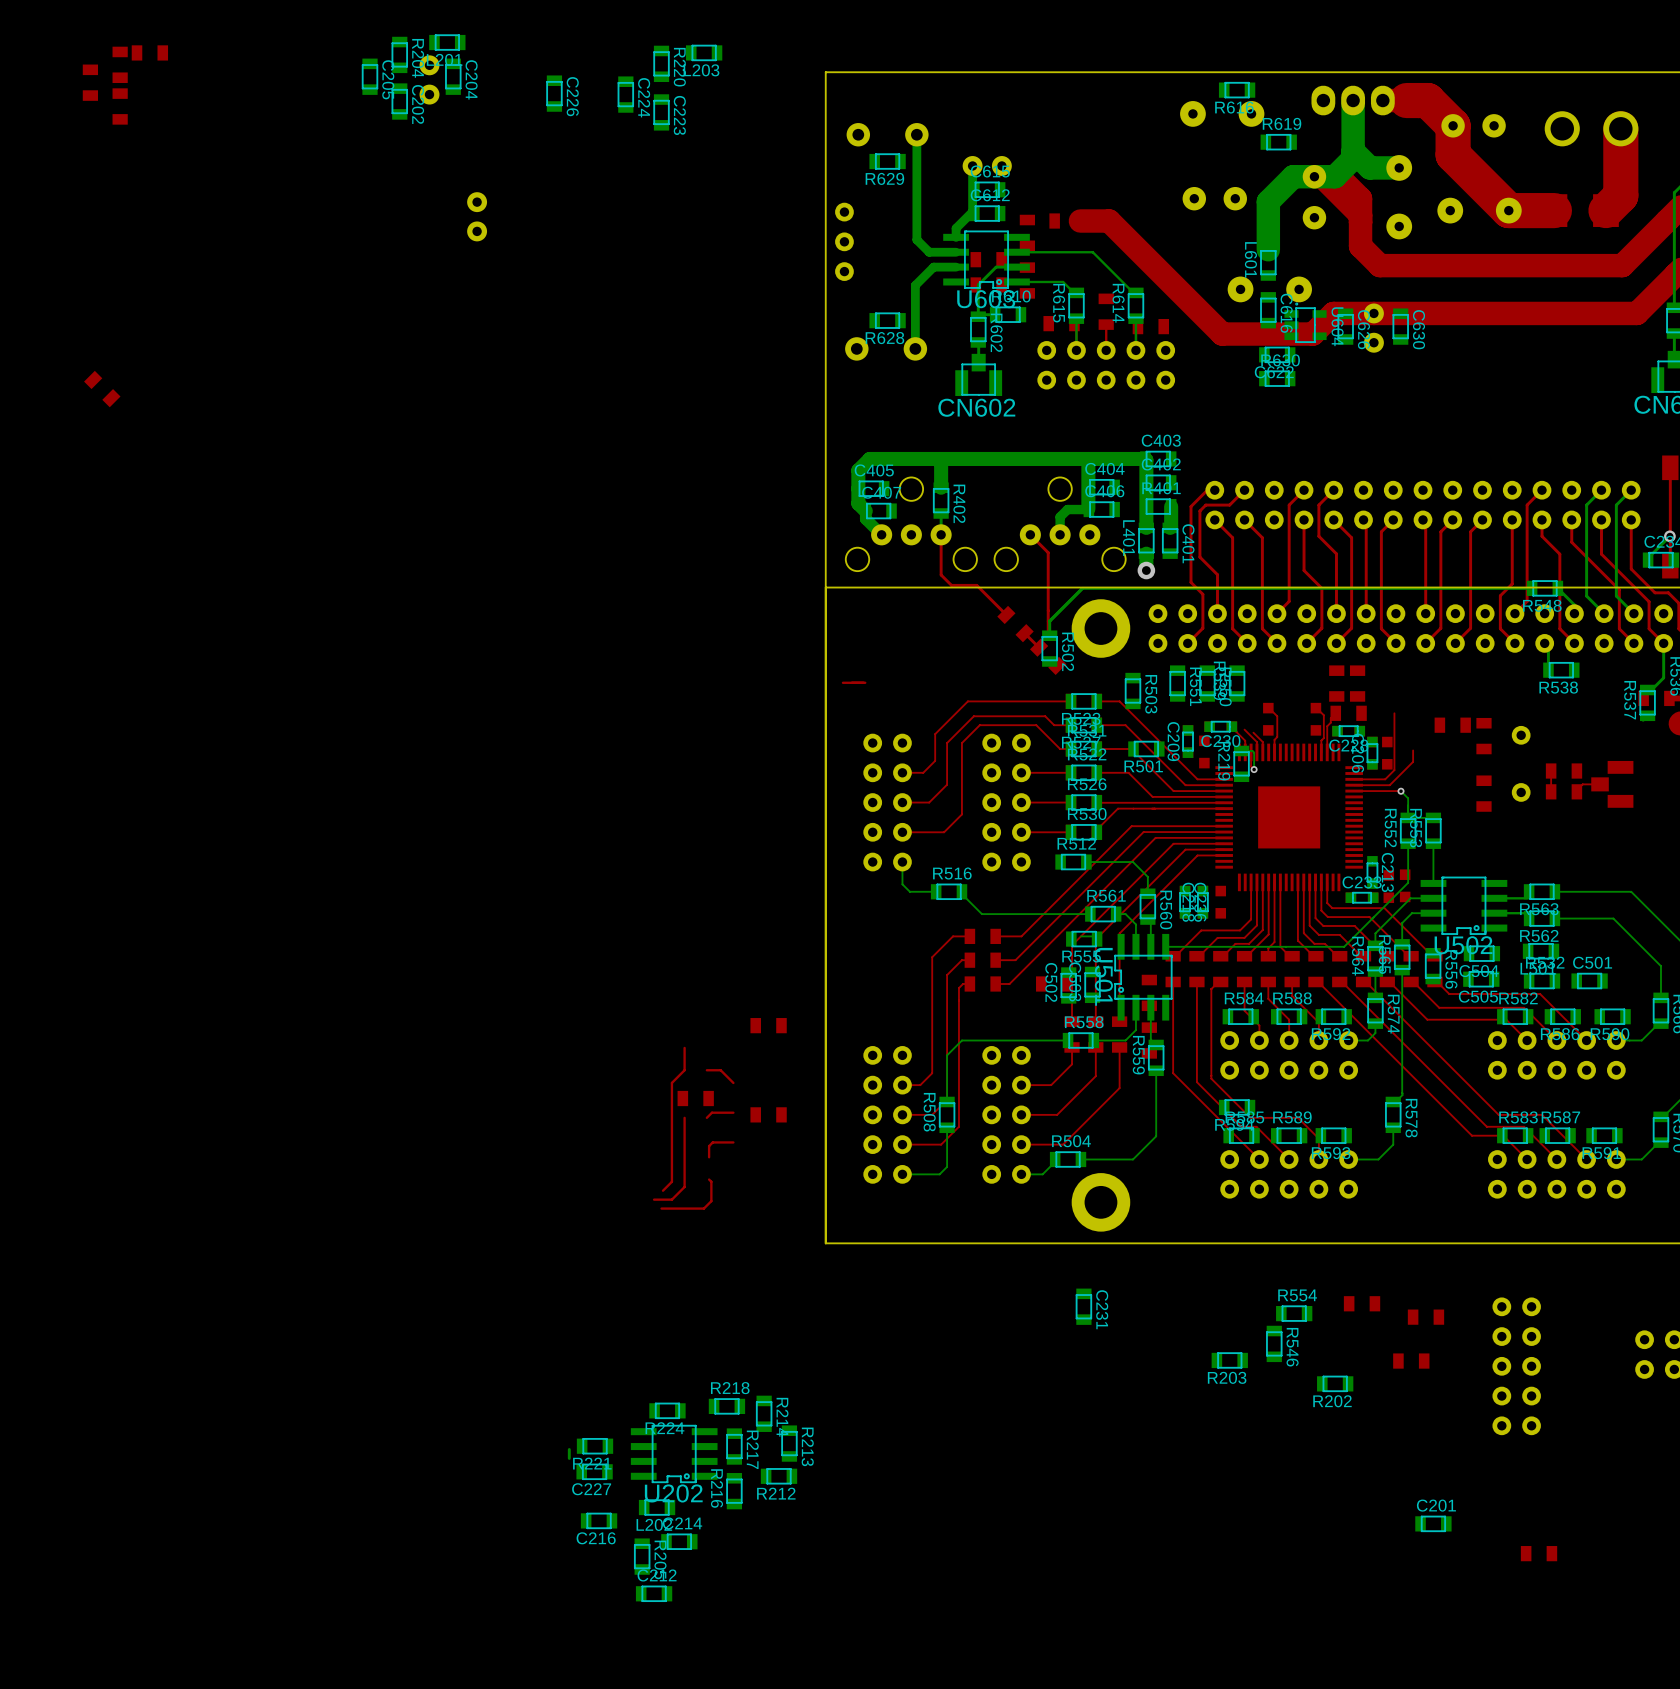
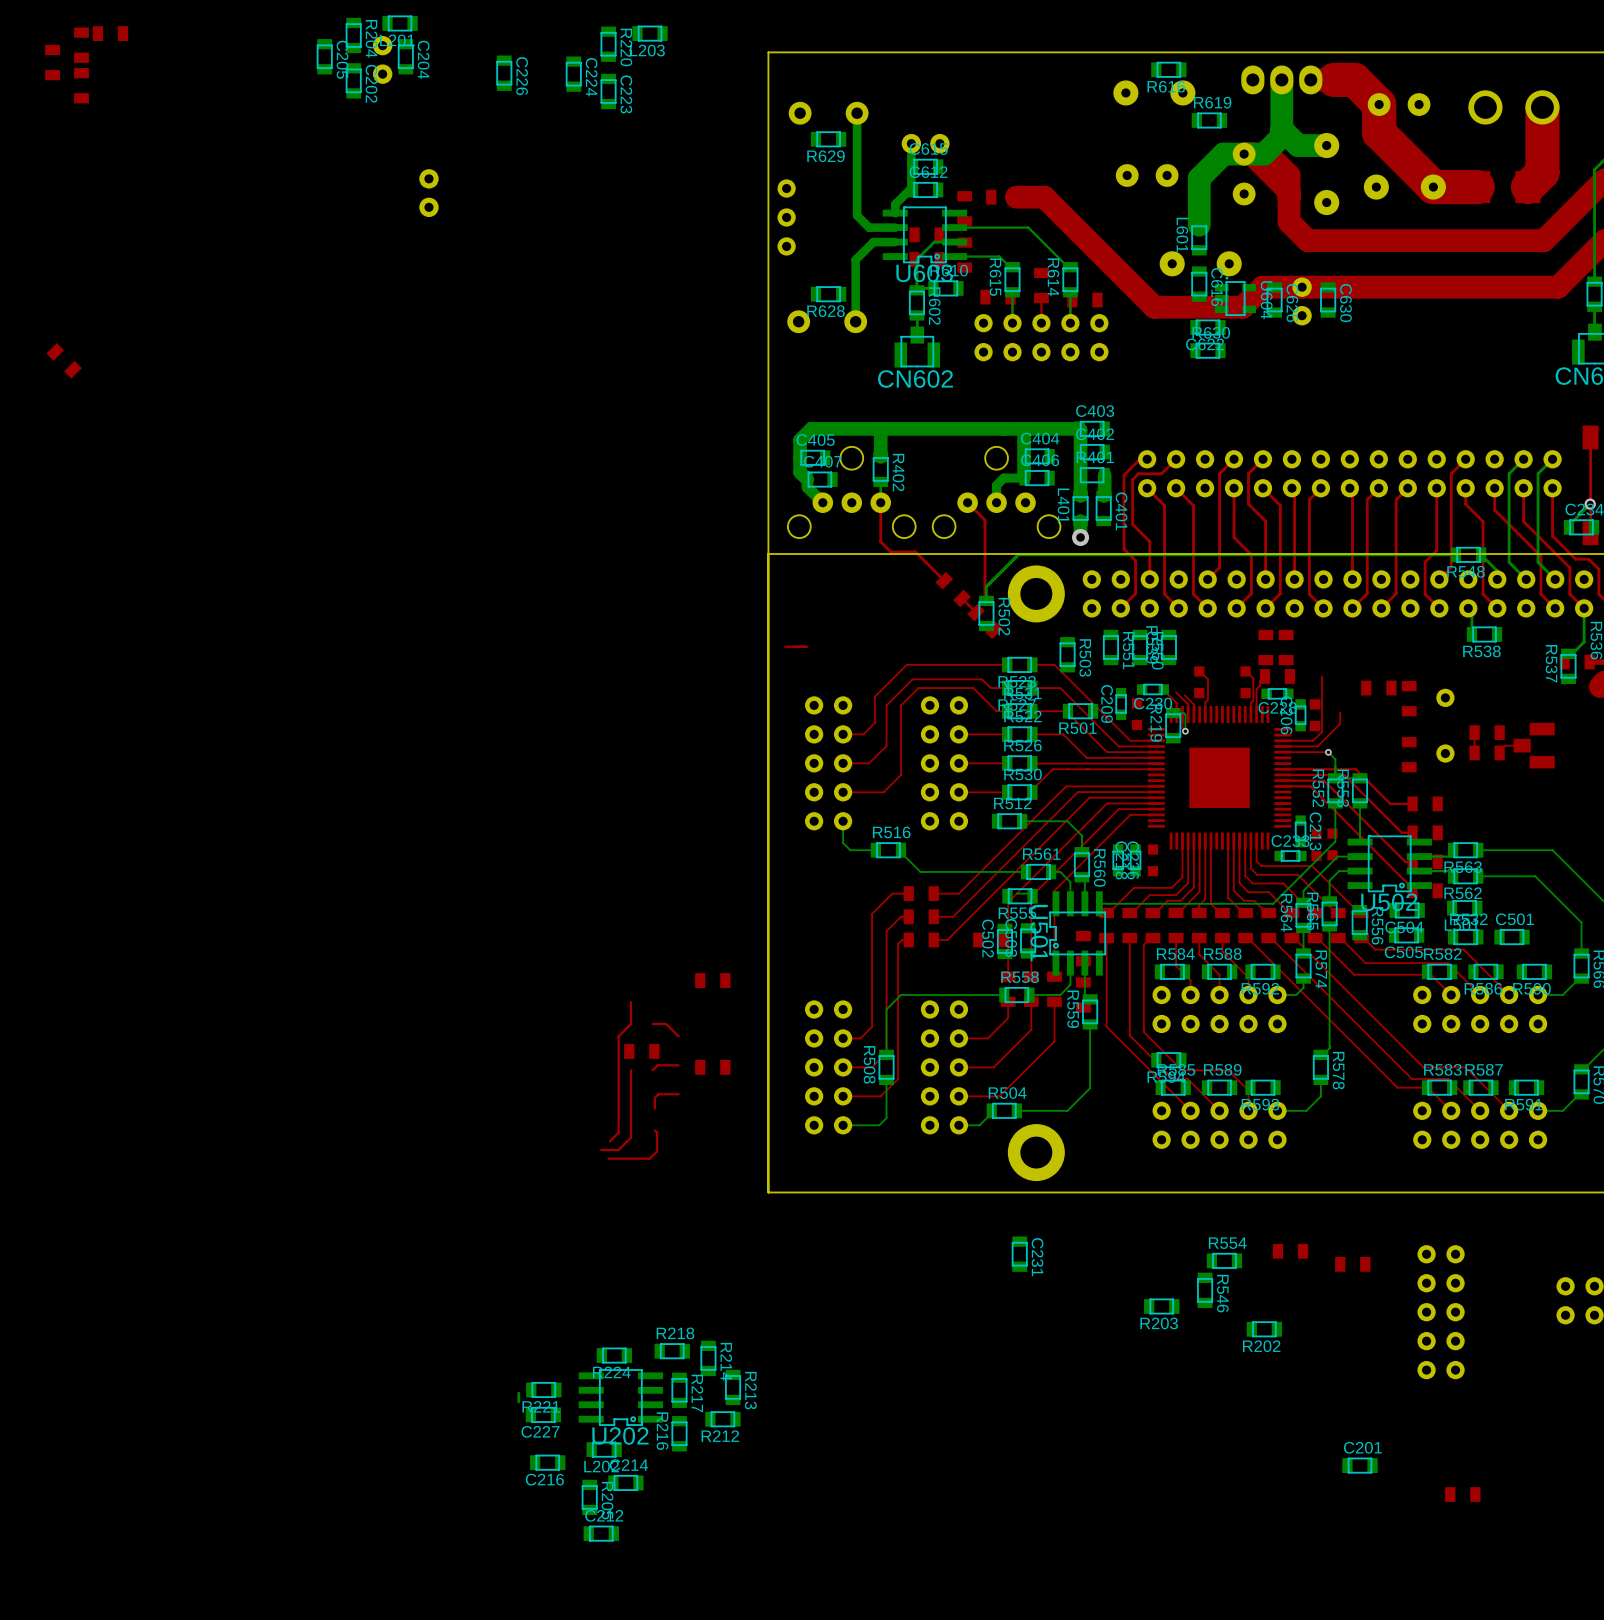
top track: none -> (1282, 769) (1355, 769) (1390, 803) (1412, 803)
top track: none -> (1282, 774) (1344, 774) (1401, 832) (1412, 832)
top track: none -> (1282, 780) (1324, 780) (1405, 861) (1412, 861)
top track: none -> (1282, 786) (1310, 786) (1412, 888) (1412, 890)
part: none -> (1425, 803)
part: none -> (1425, 832)
part: none -> (1425, 861)
part: none -> (1425, 890)
part: (1411, 1361) -> none

